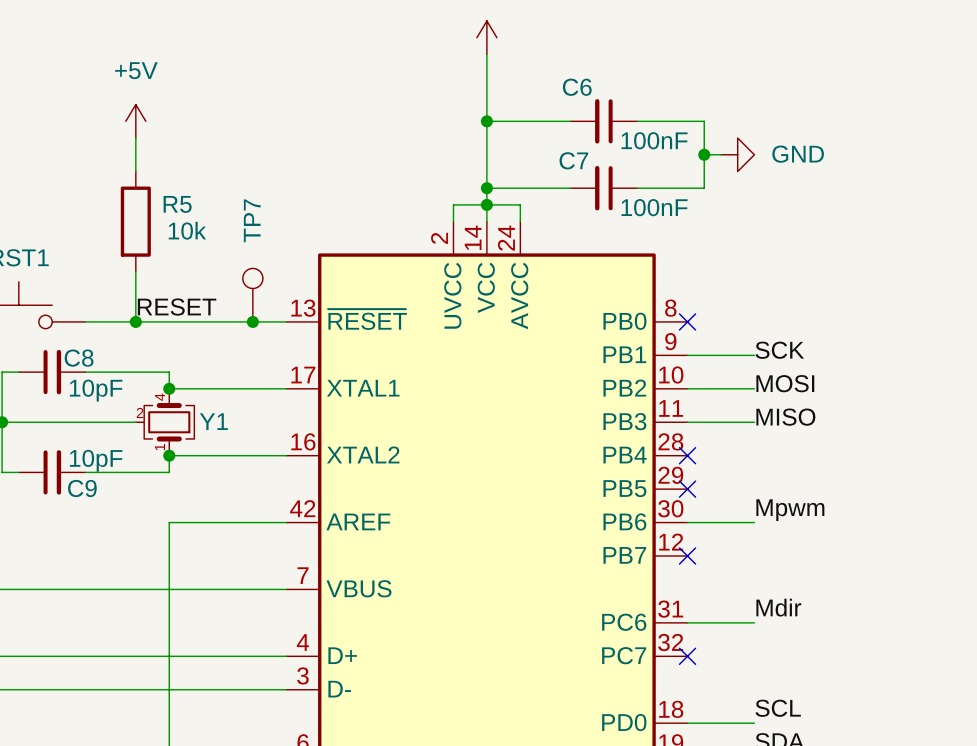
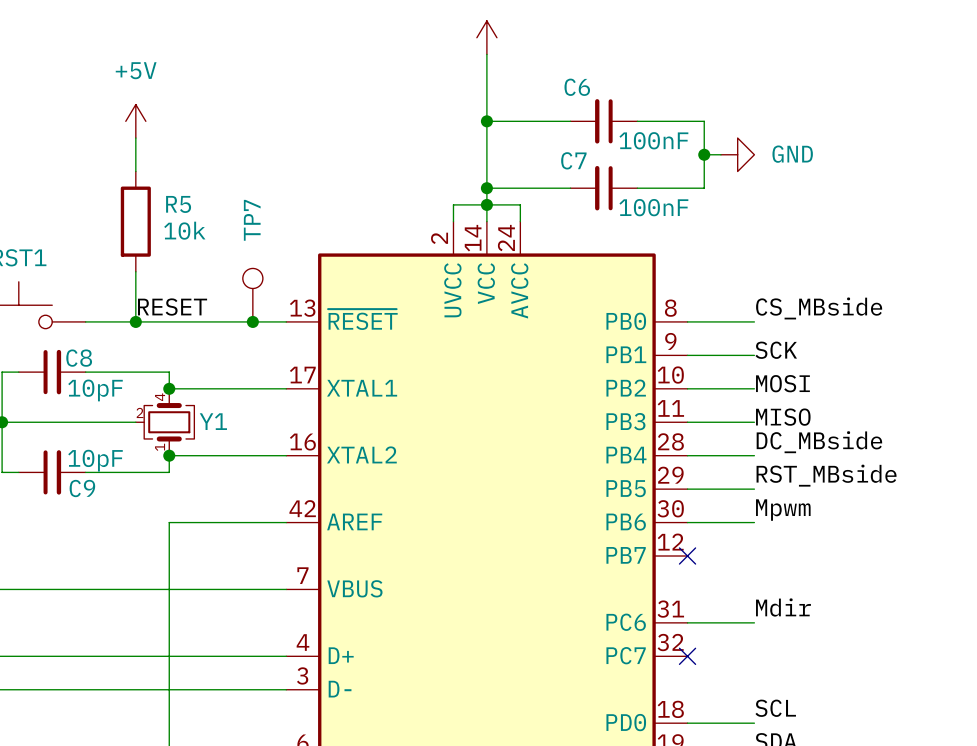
label: none -> CS_MBside (819, 308)
wire: none -> (687, 321) (754, 321)
no-connect mark: (687, 321) -> none
label: none -> DC_MBside (819, 442)
wire: none -> (687, 455) (754, 455)
no-connect mark: (687, 455) -> none
label: none -> RST_MBside (826, 475)
wire: none -> (687, 489) (754, 489)
no-connect mark: (687, 489) -> none

